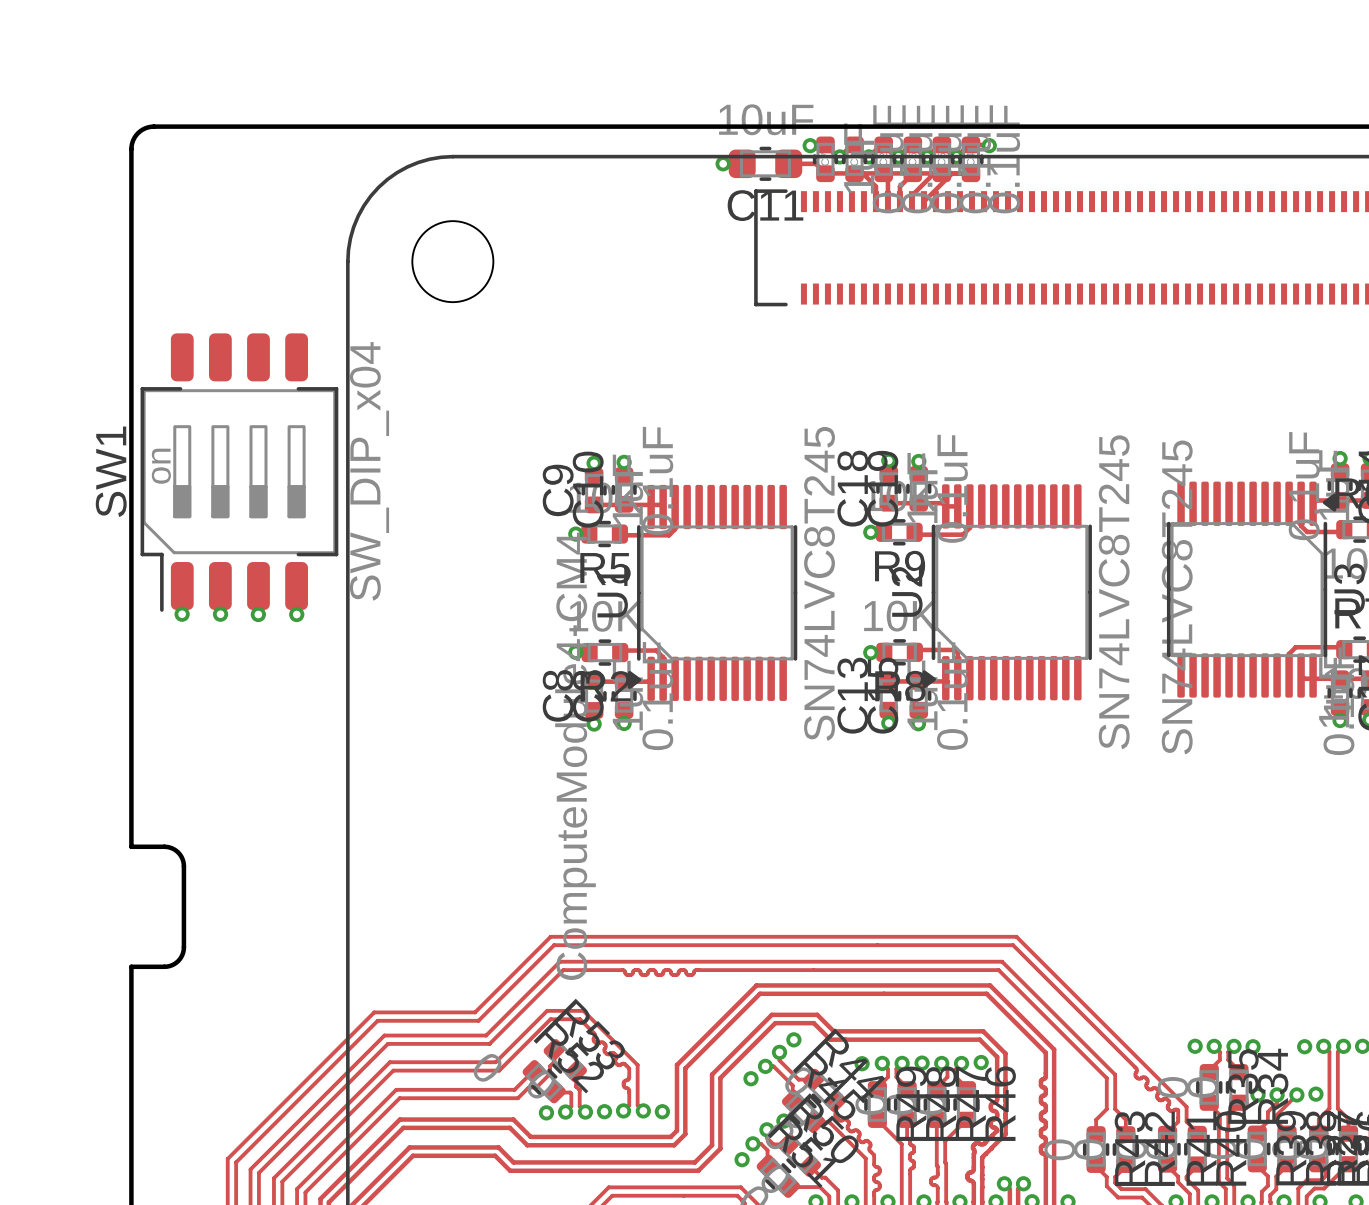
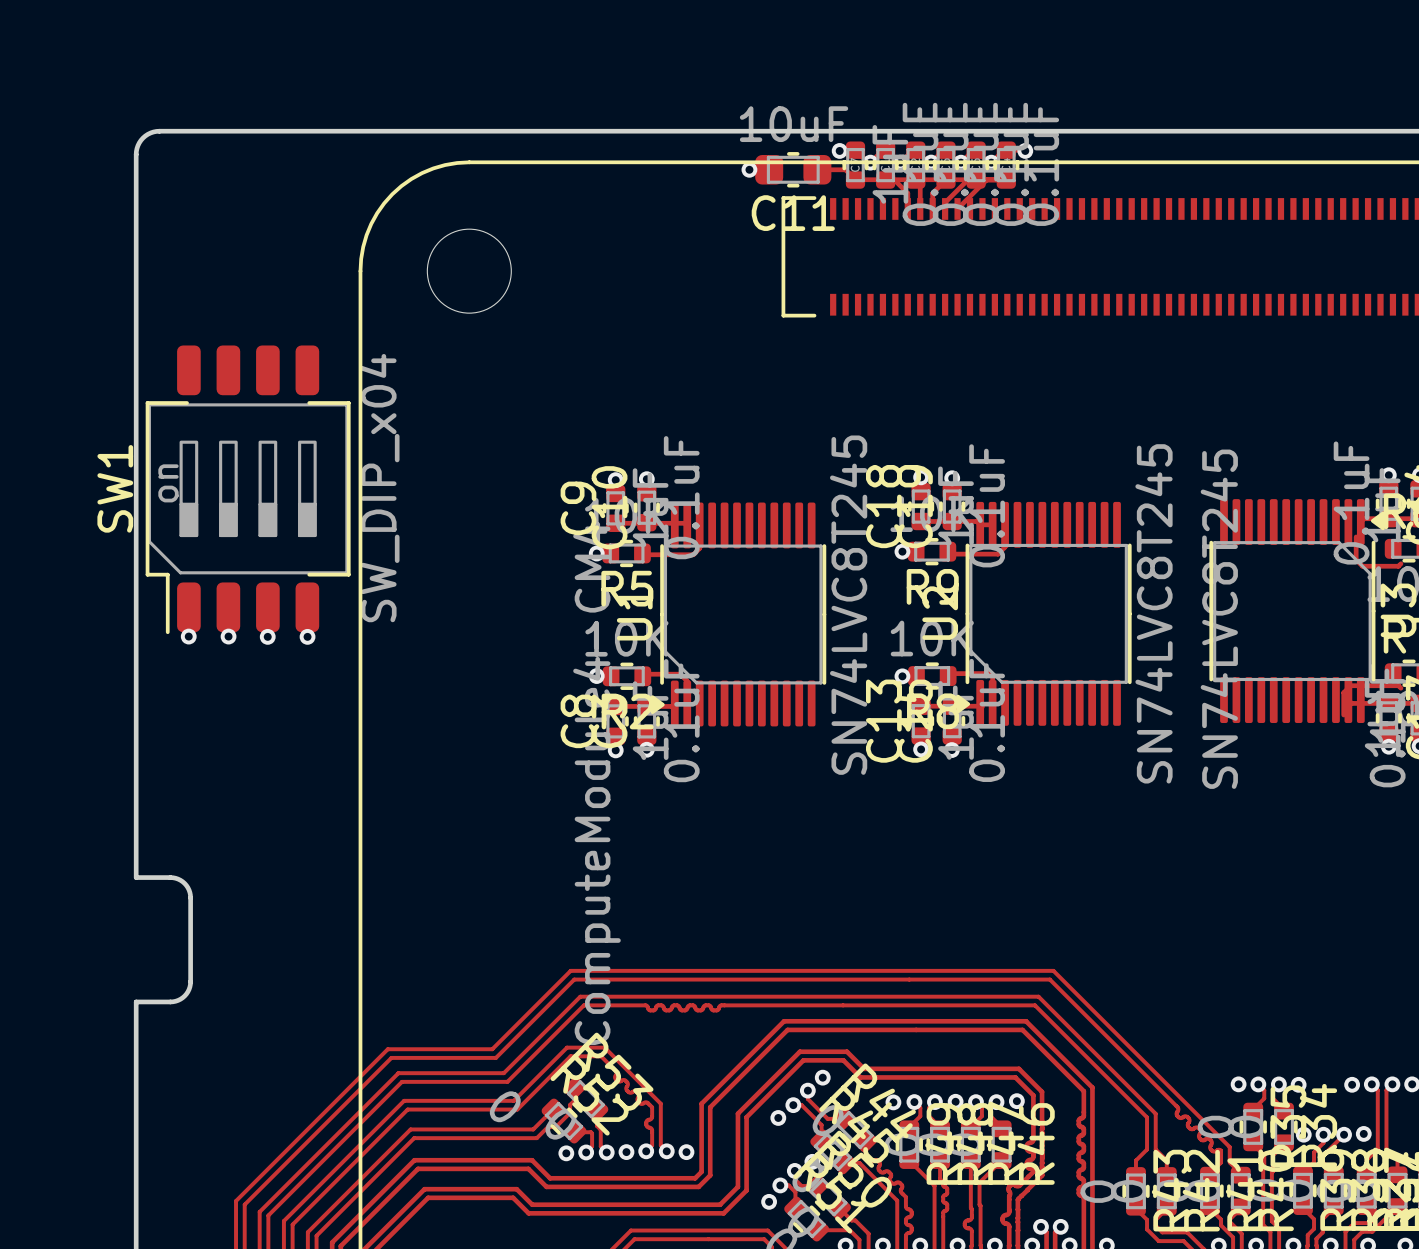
track: (1301, 503) (1301, 525) (1307, 531) (1341, 531) (1344, 529) -> (1356, 536) (1356, 559) (1362, 566) (1398, 566) (1400, 563)
track: (1344, 649) (1341, 647) (1295, 647) (1289, 654) (1289, 675) -> (1400, 688) (1398, 685) (1350, 685) (1343, 692) (1343, 715)

